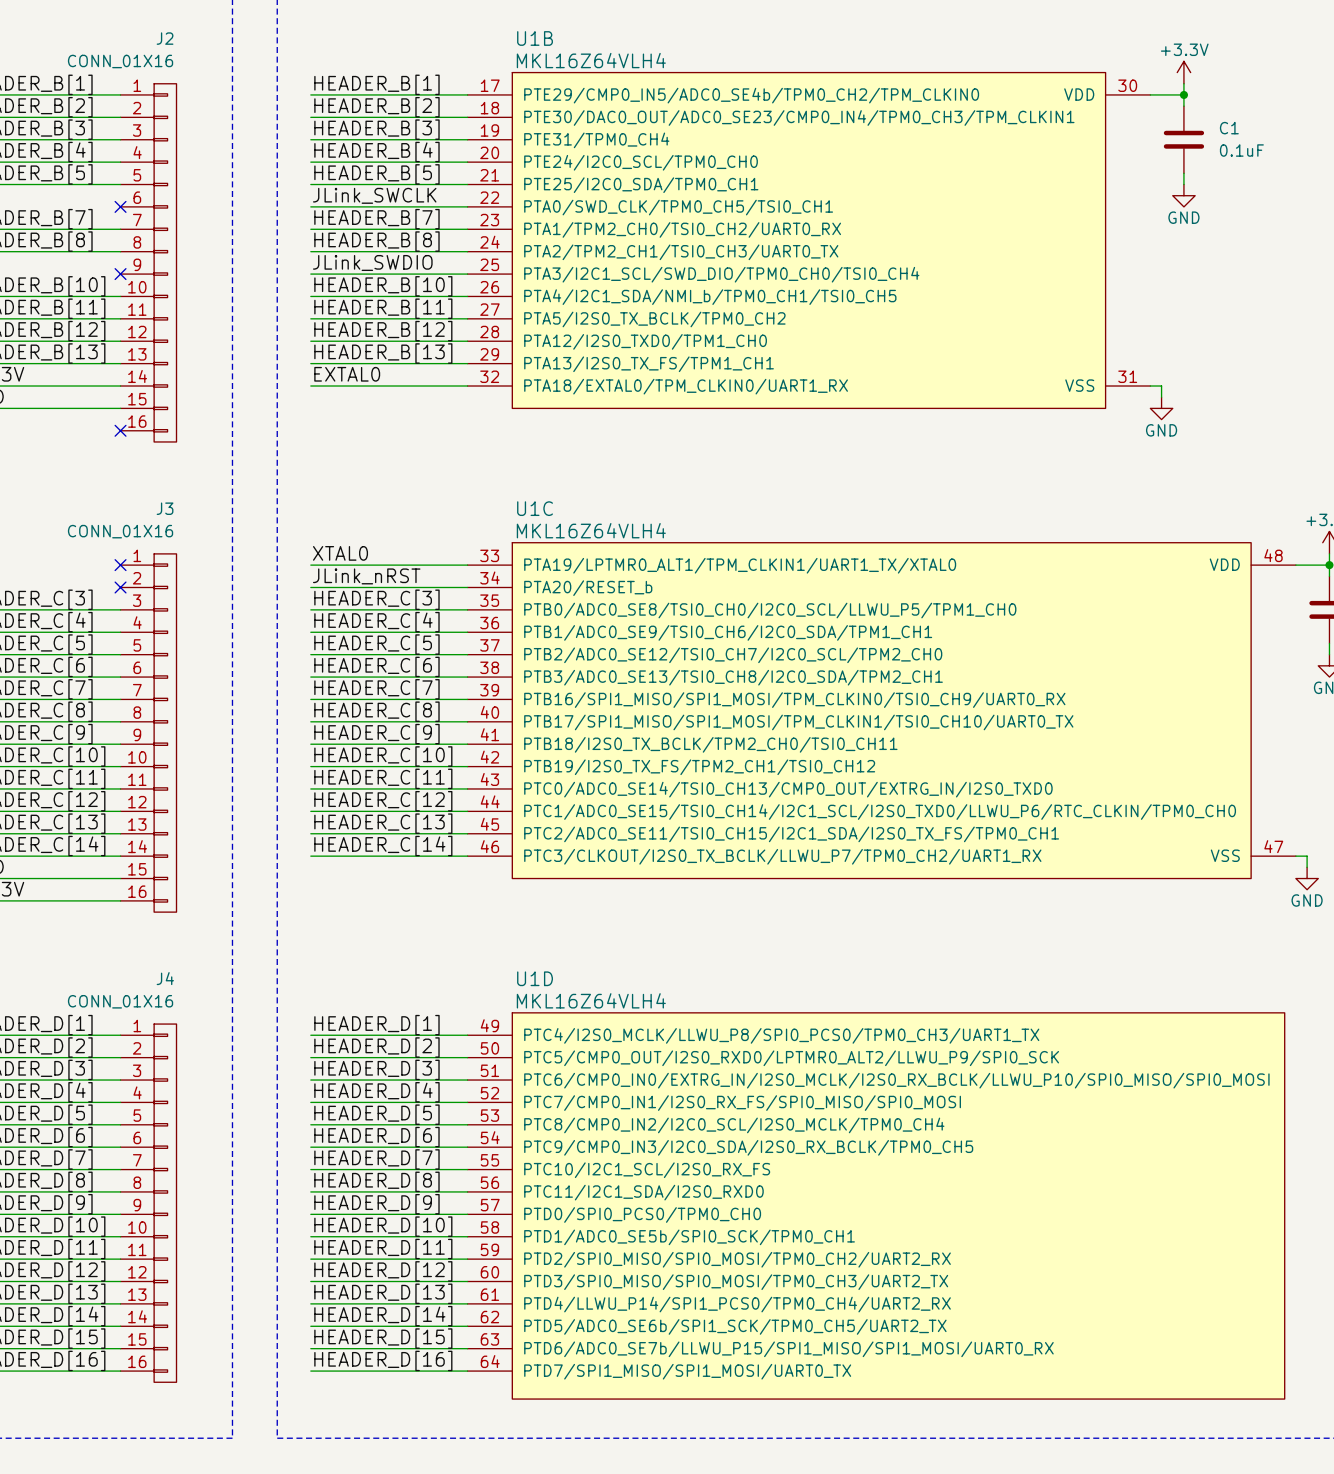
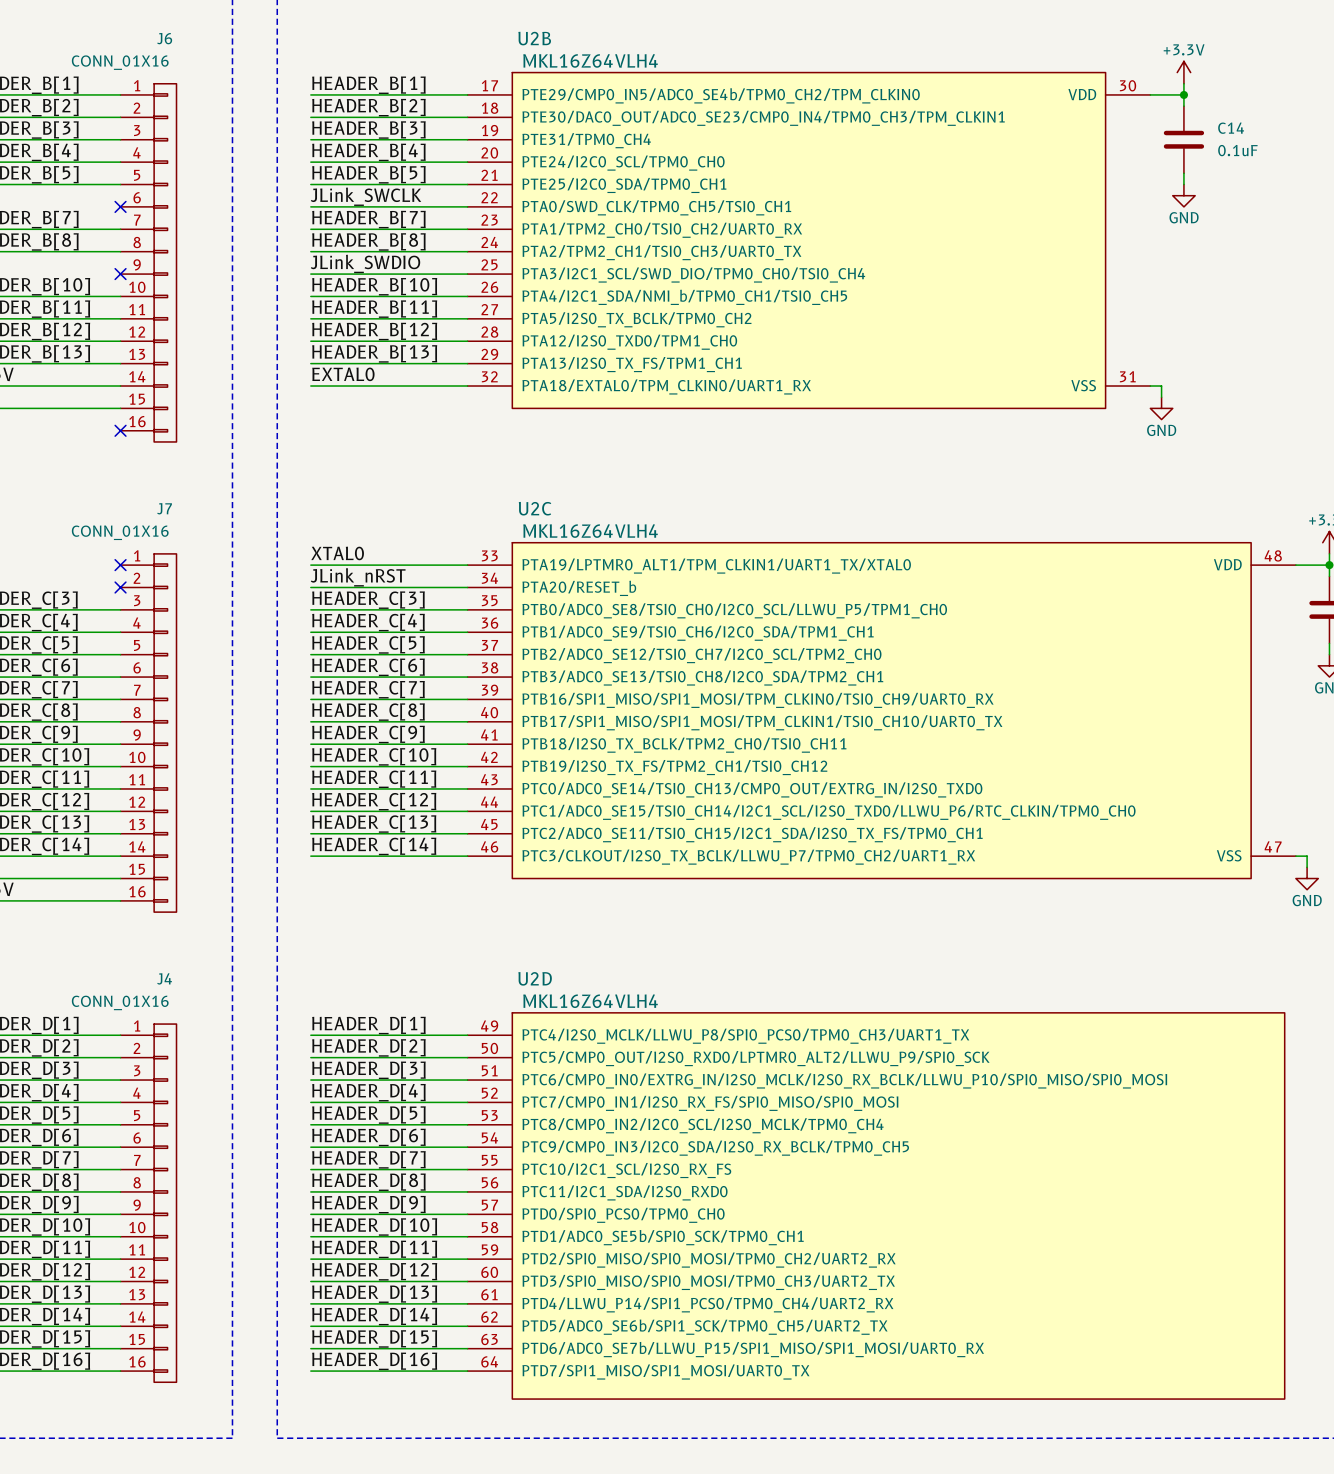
J2 name: J2 (165, 38) -> J6 (164, 38)
U1B name: U1B (535, 38) -> U2B (534, 38)
C1 name: C1 (1229, 128) -> C14 (1231, 128)
J3 name: J3 (165, 508) -> J7 (164, 508)
U1C name: U1C (535, 508) -> U2C (535, 508)
U1D name: U1D (535, 978) -> U2D (535, 978)

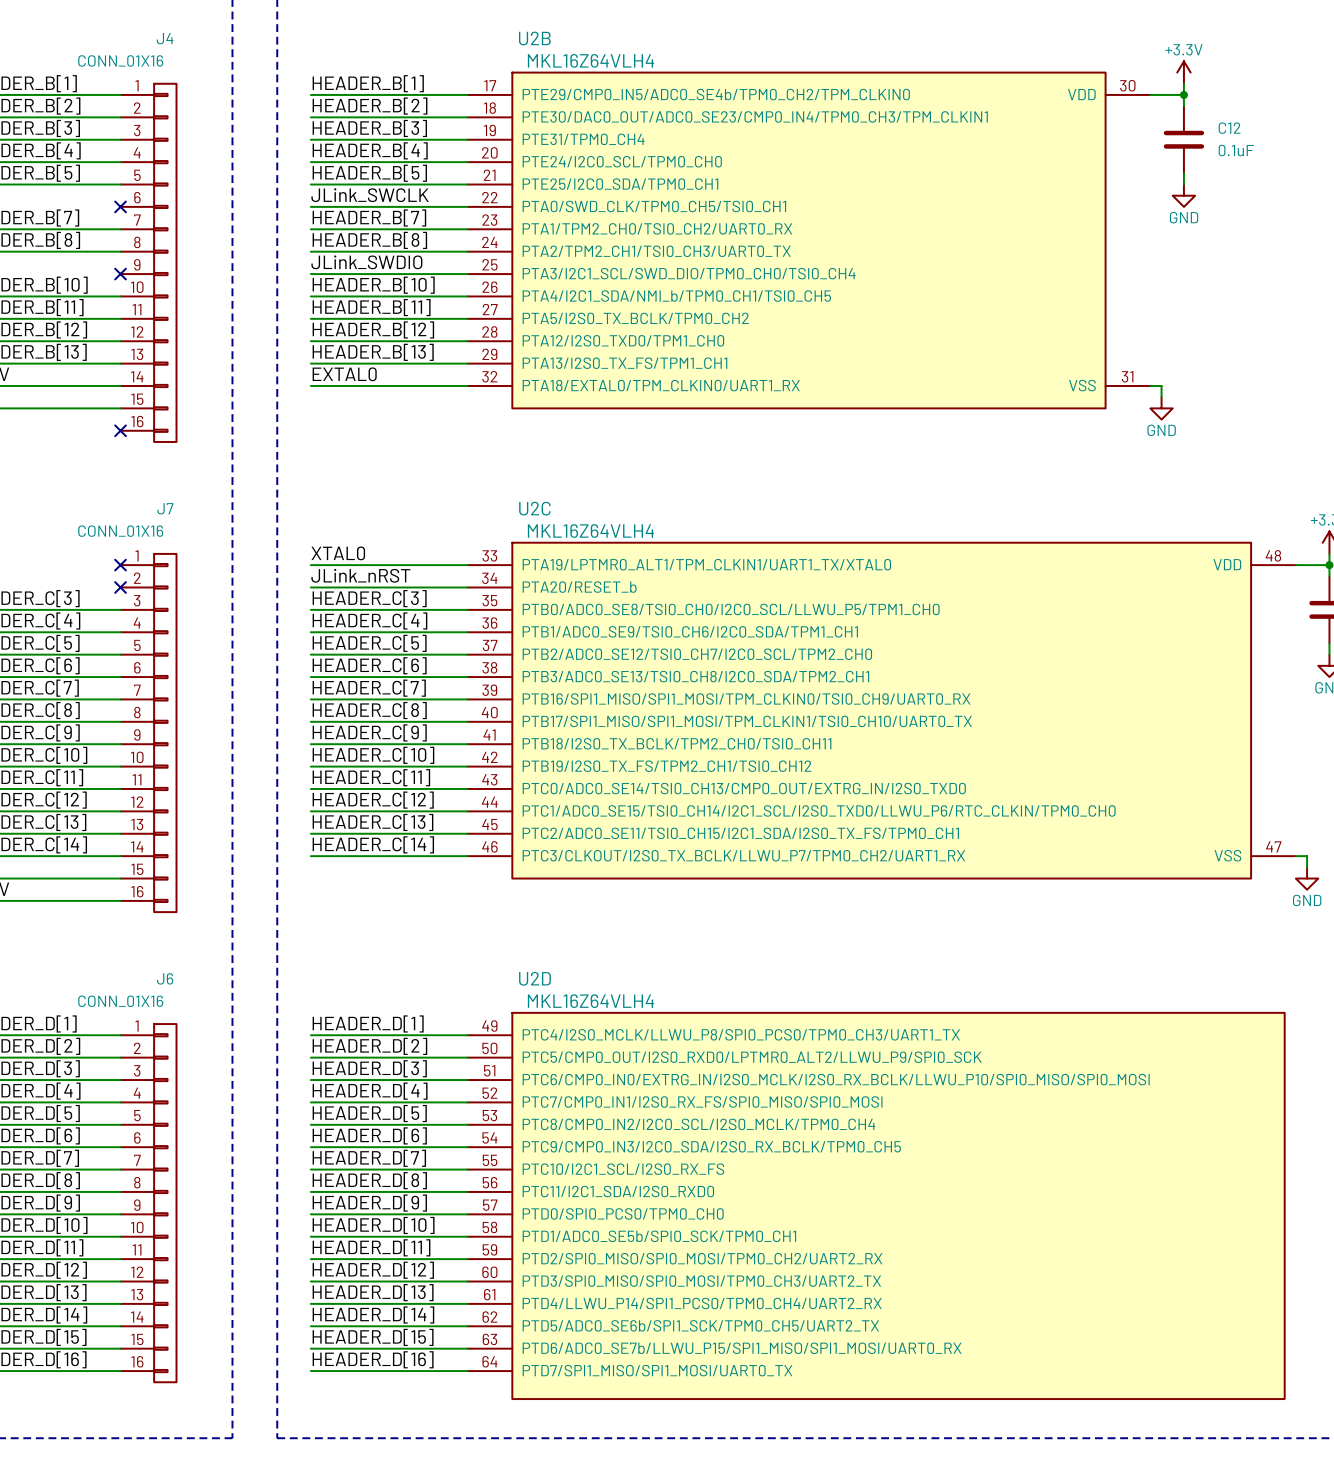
J6 name: J6 (164, 38) -> J4 (165, 38)
C14 name: C14 (1231, 128) -> C12 (1229, 128)
J4 name: J4 (164, 978) -> J6 (165, 978)

